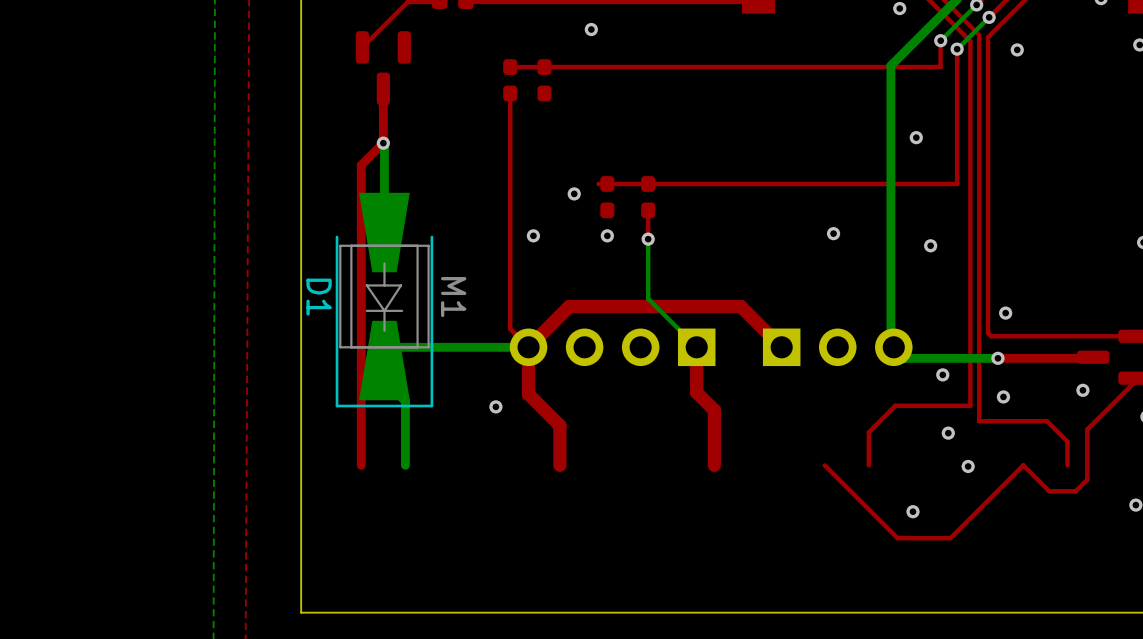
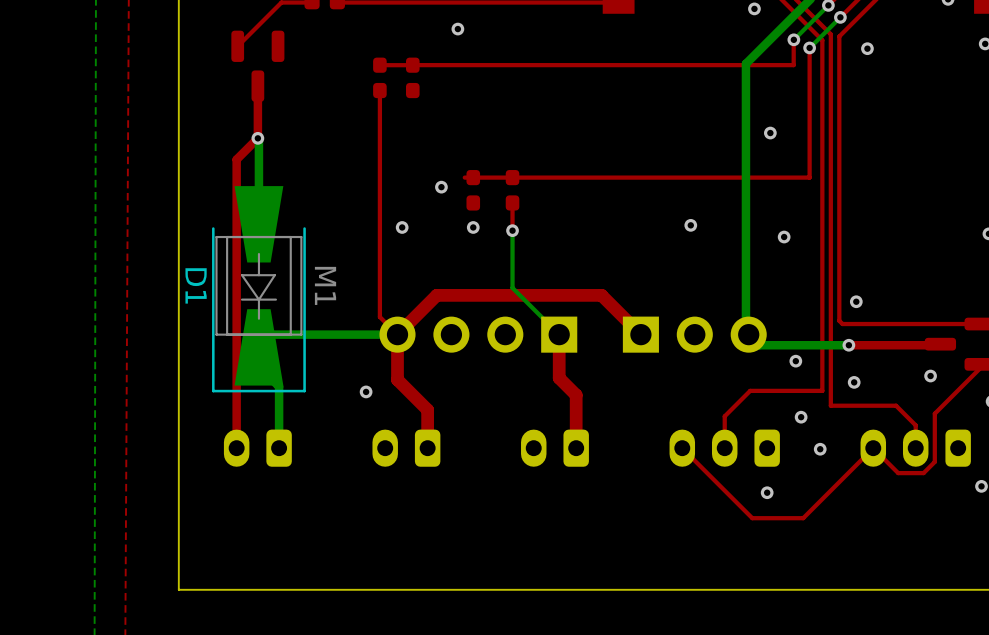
part: none -> (257, 448)
part: none -> (406, 448)
part: none -> (554, 448)
part: none -> (724, 448)
part: none -> (915, 448)

